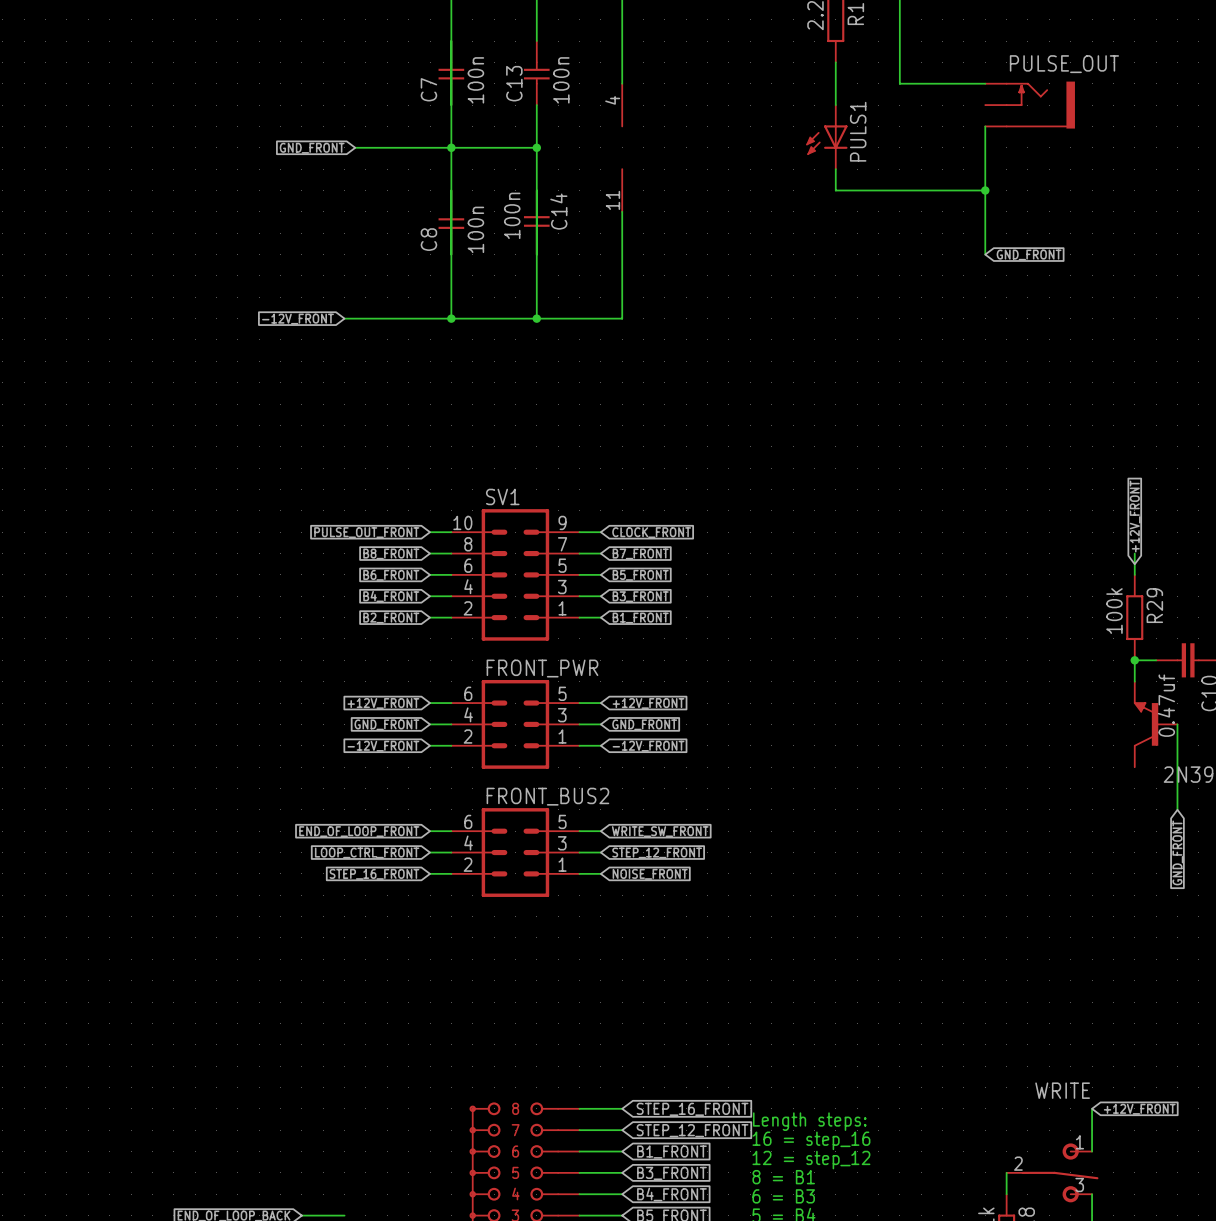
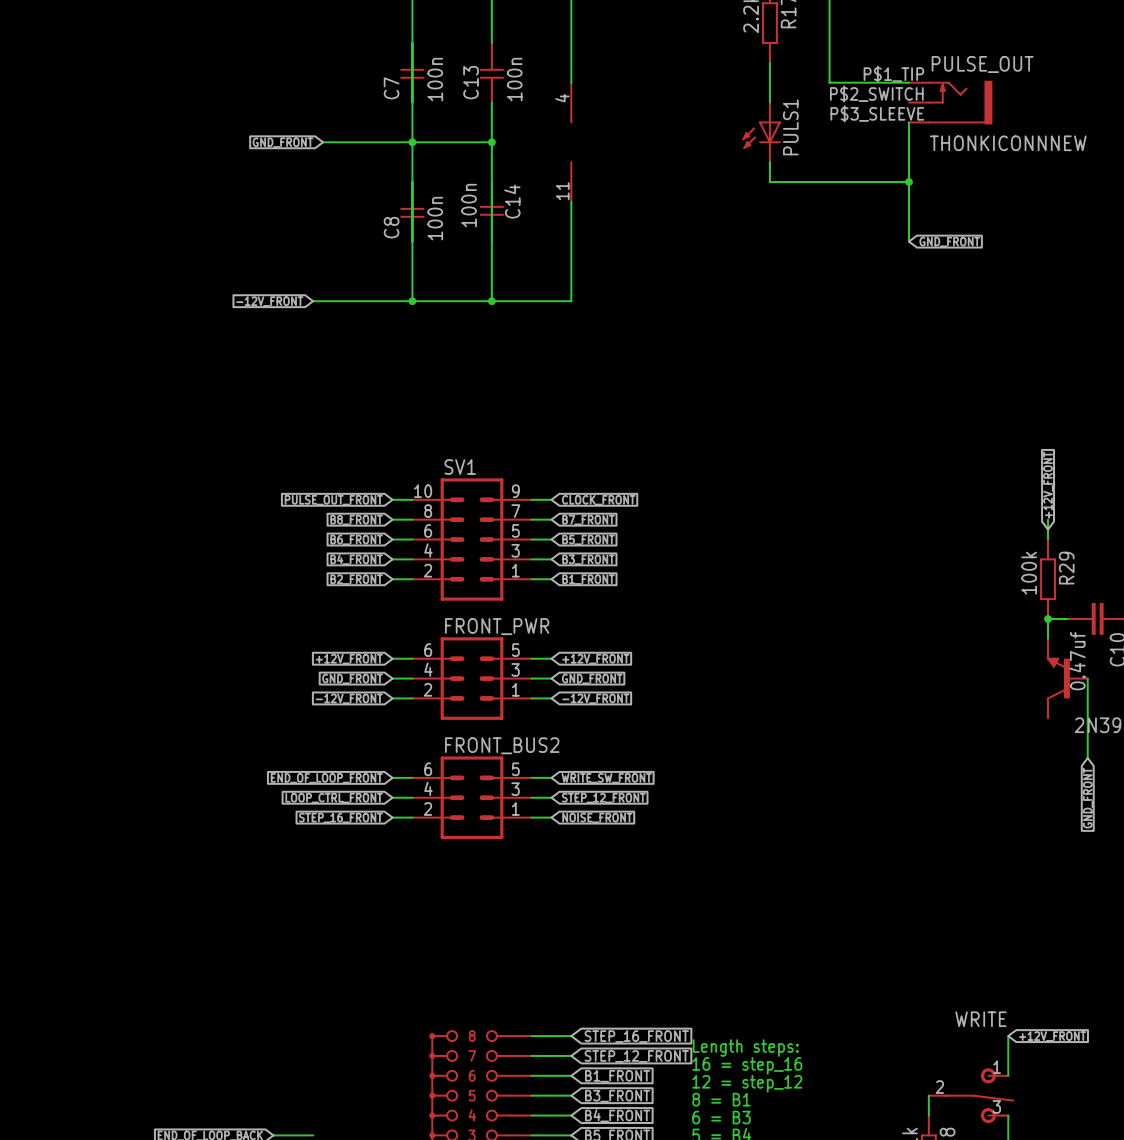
PULSE_OUT pin number: none -> P$1_TIP (893, 74)
PULSE_OUT pin number: none -> P$2_SWITCH (876, 93)
PULSE_OUT pin number: none -> P$3_SLEEVE (877, 113)
PULSE_OUT value: none -> THONKICONNNEW (1008, 143)

